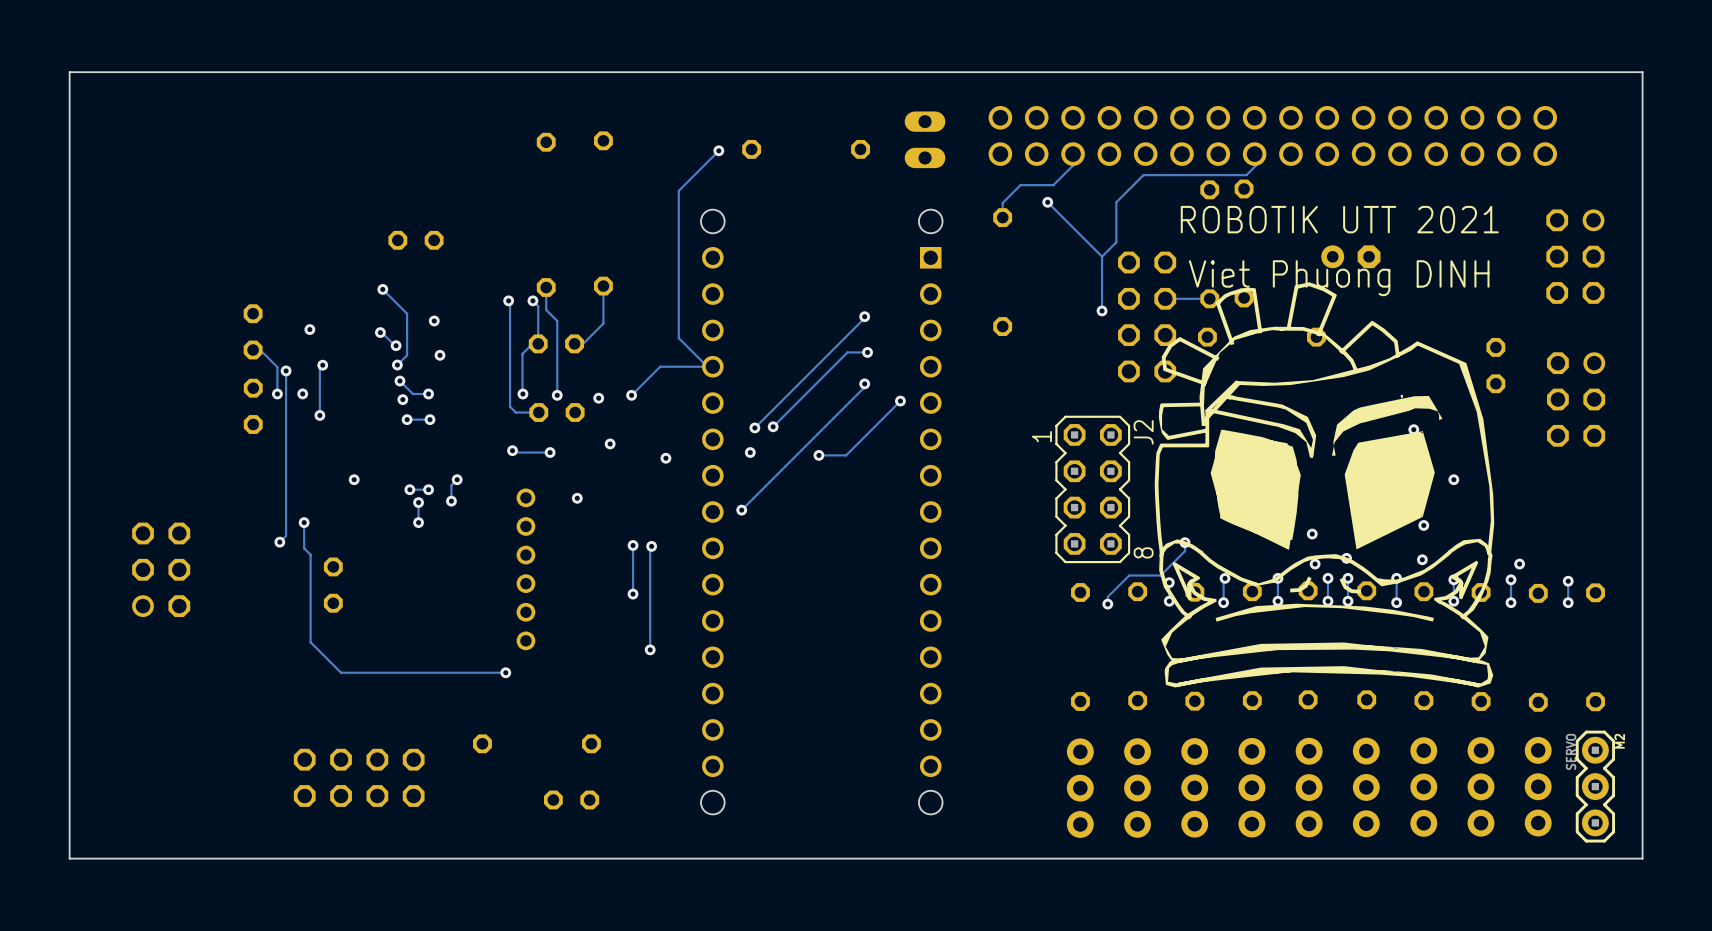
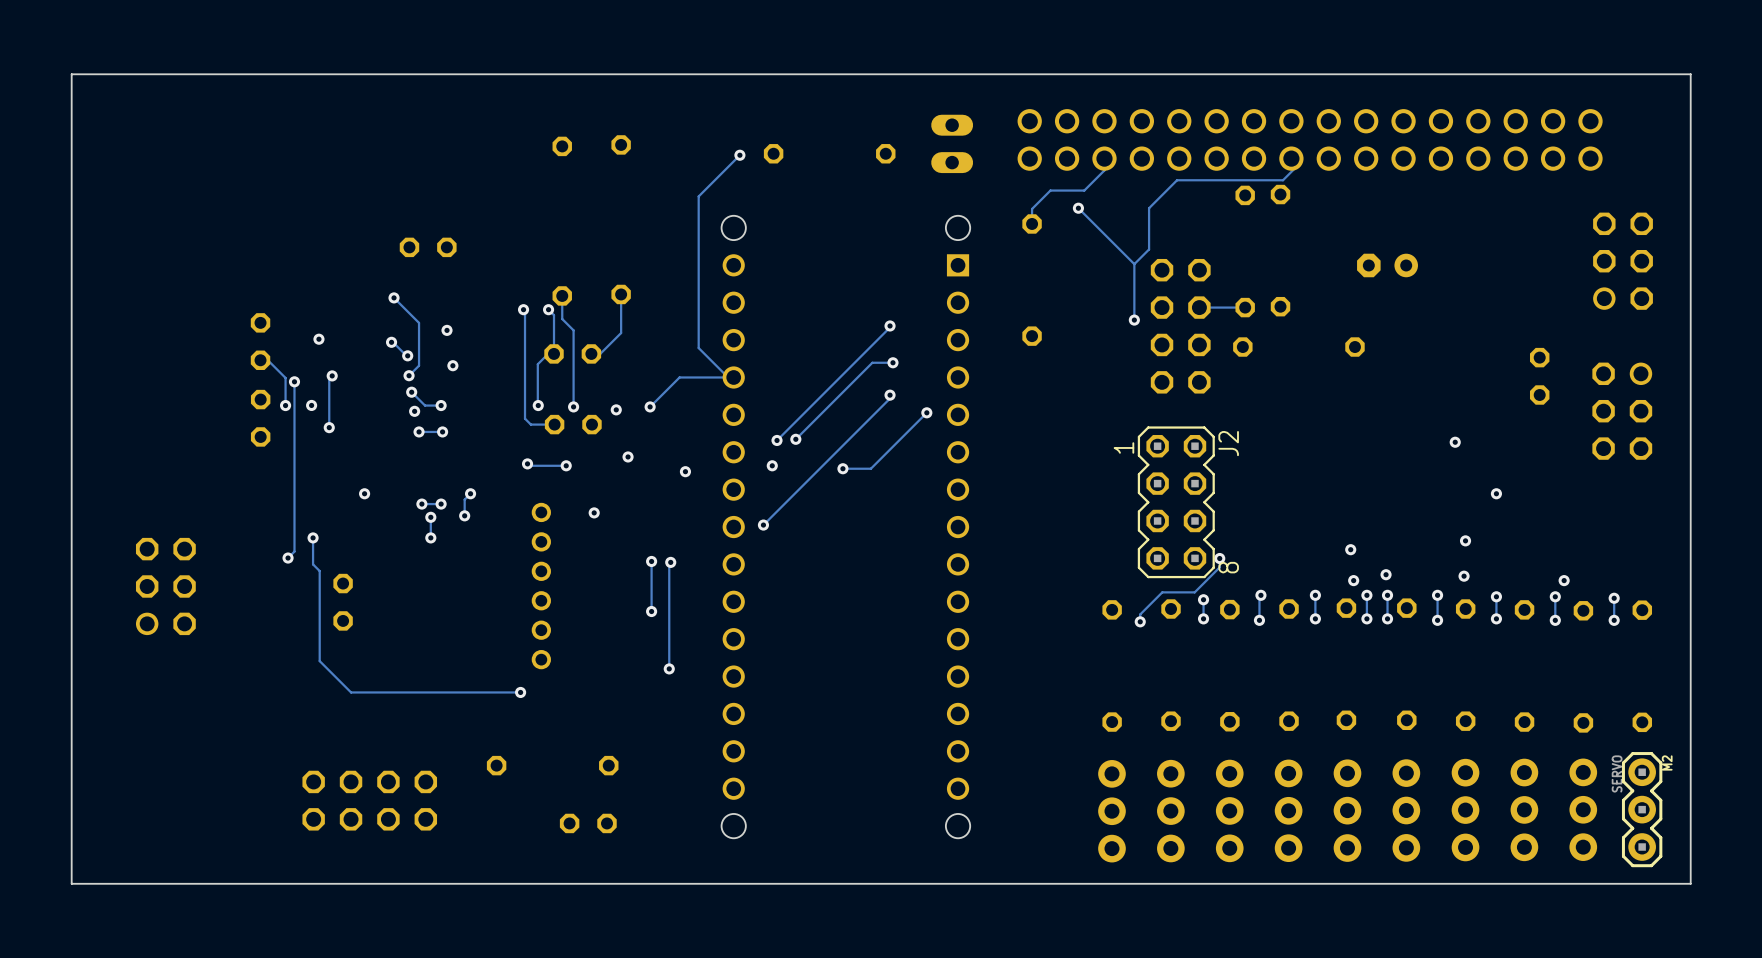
text: ROBOTIK UTT 2021 (1339, 219) -> none
part rotation: 0° (1350, 256) -> 180° (1387, 265)
part rotation: 0° (1575, 256) -> 180° (1623, 261)
text: Viet Phuong DINH (1339, 278) -> none
drawing: [1154, 282, 1495, 688] -> none
J2 position: (1092, 489) -> (1176, 502)

